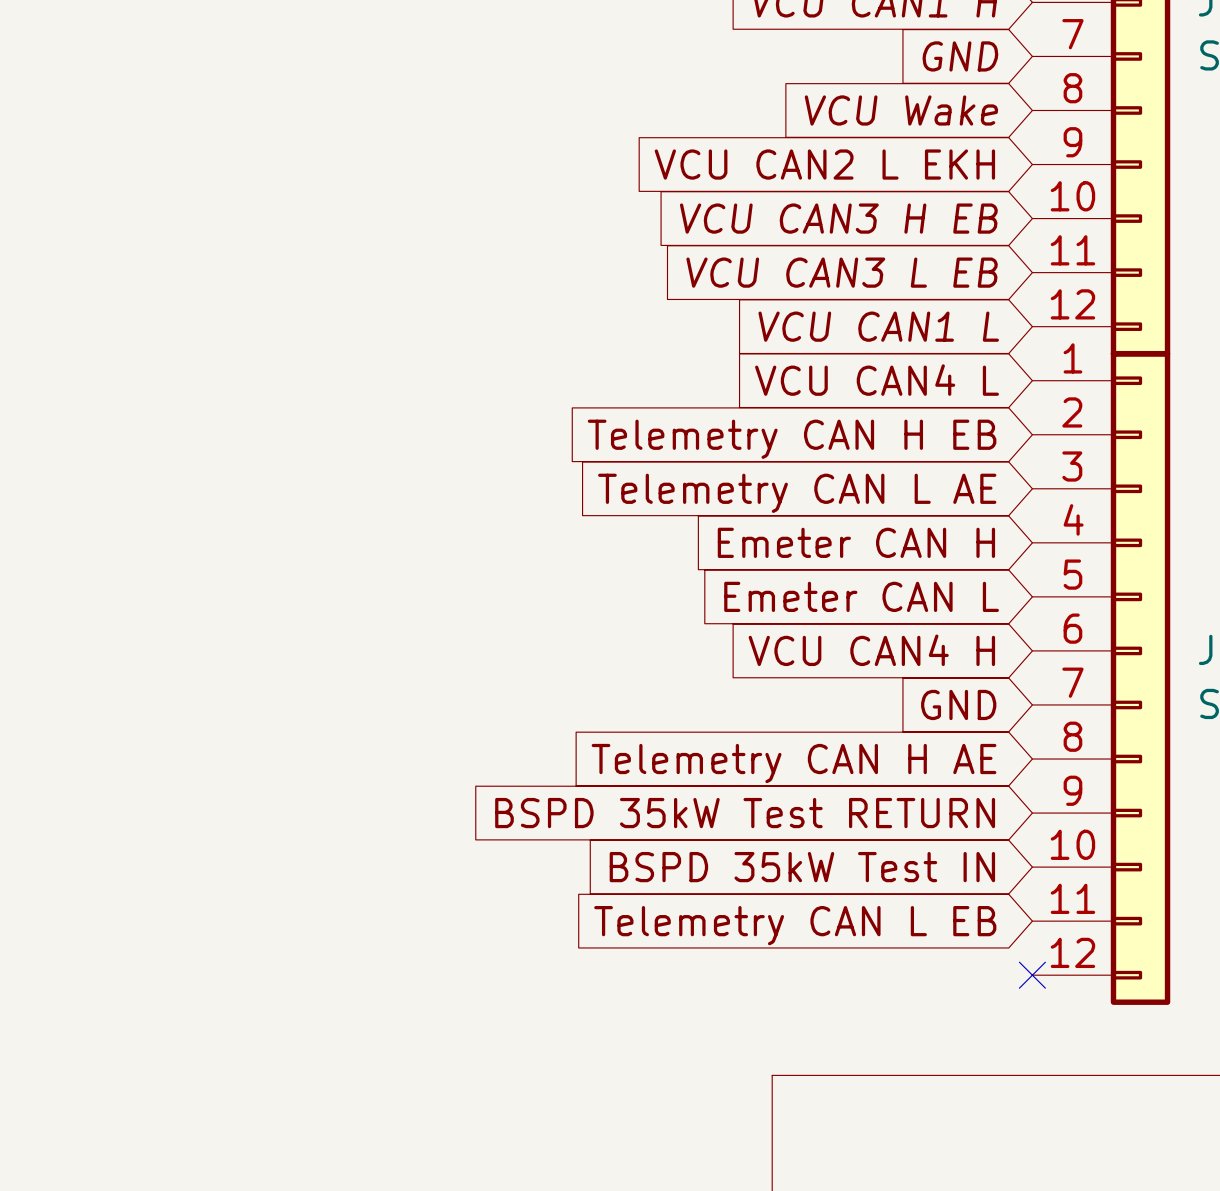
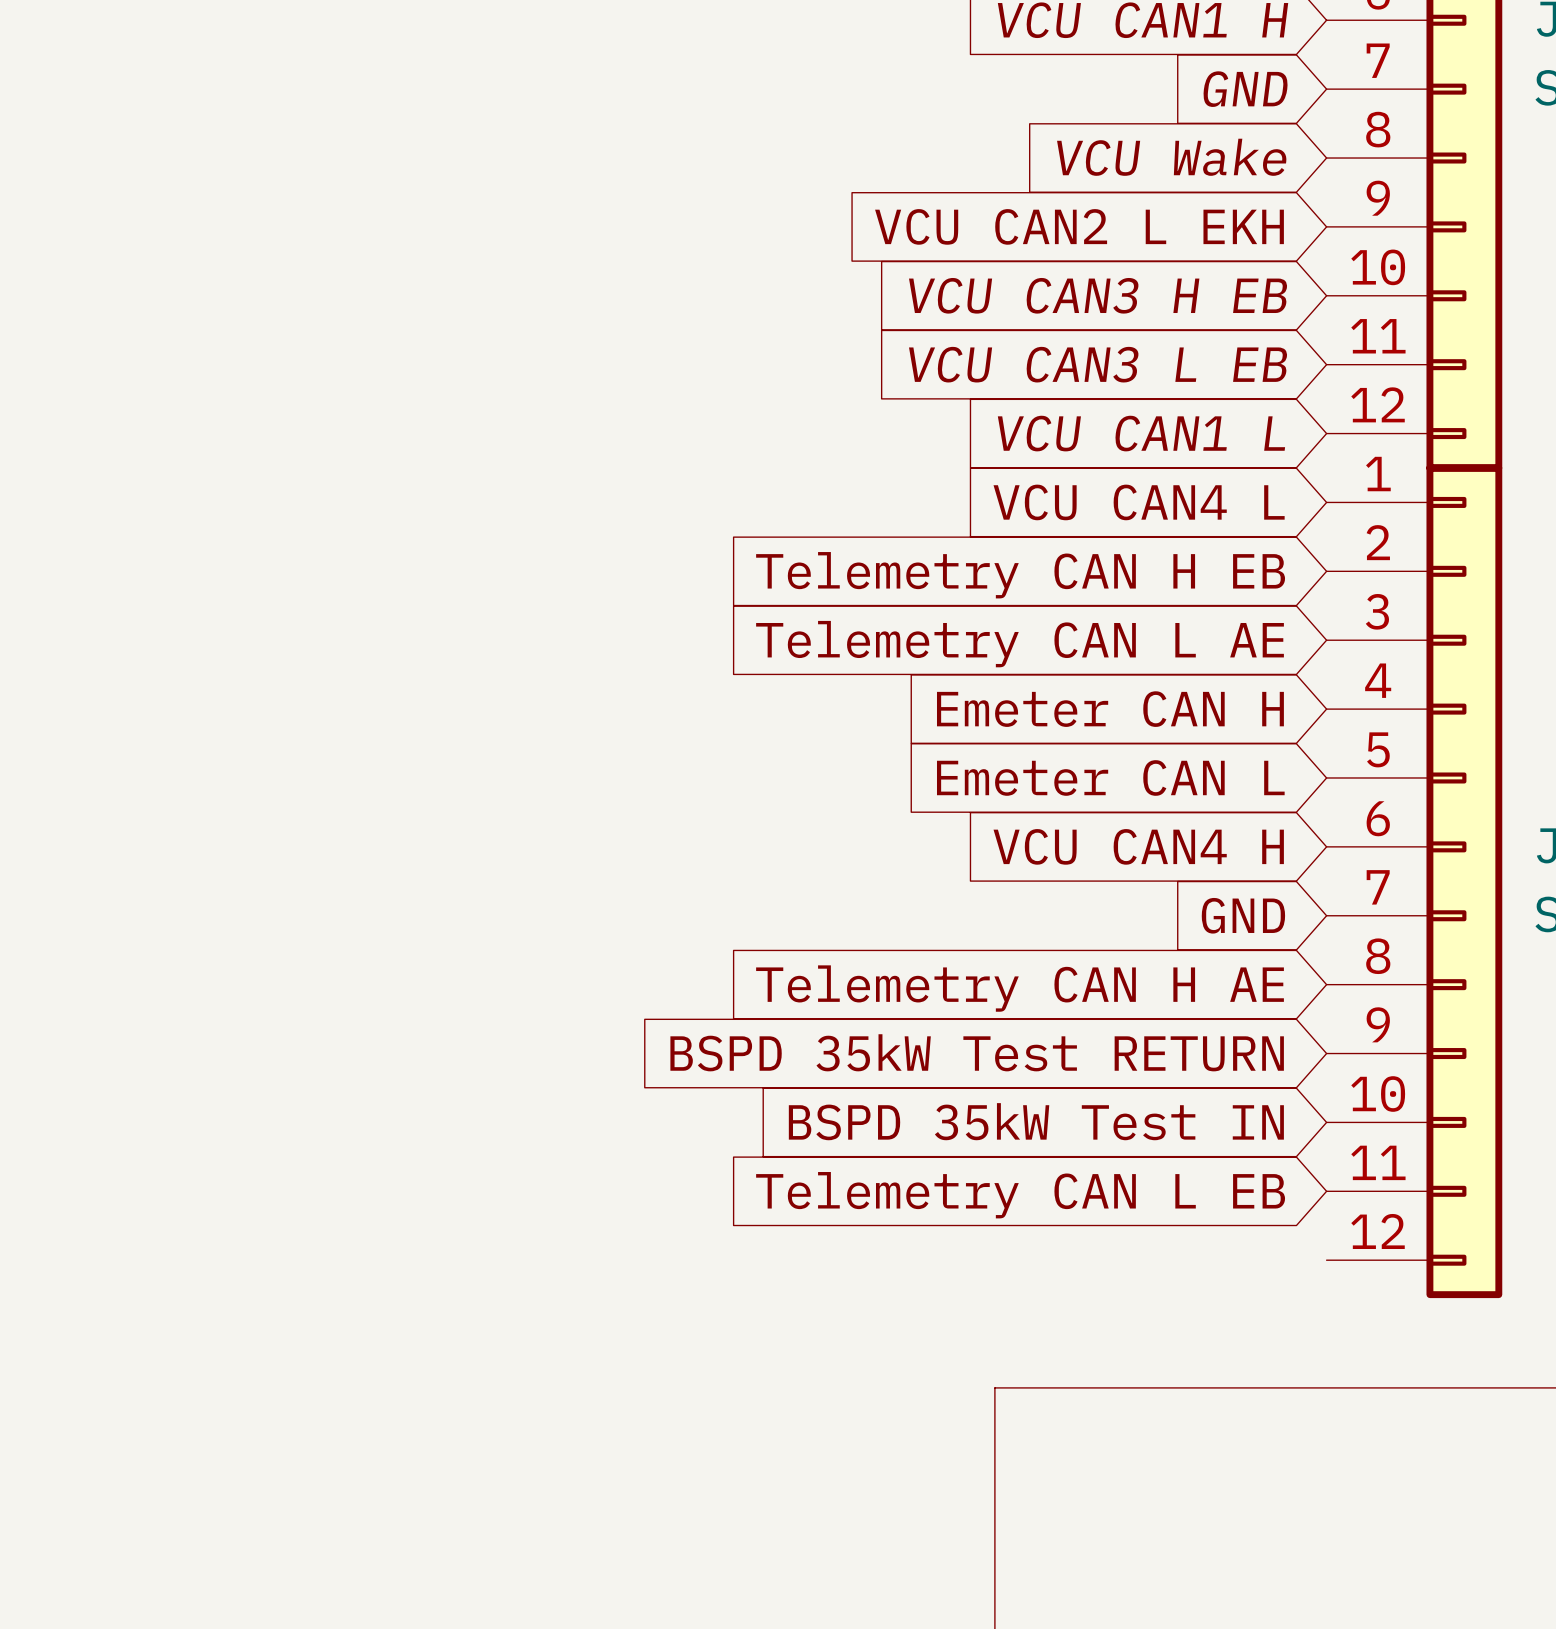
no-connect mark: (1032, 975) -> none

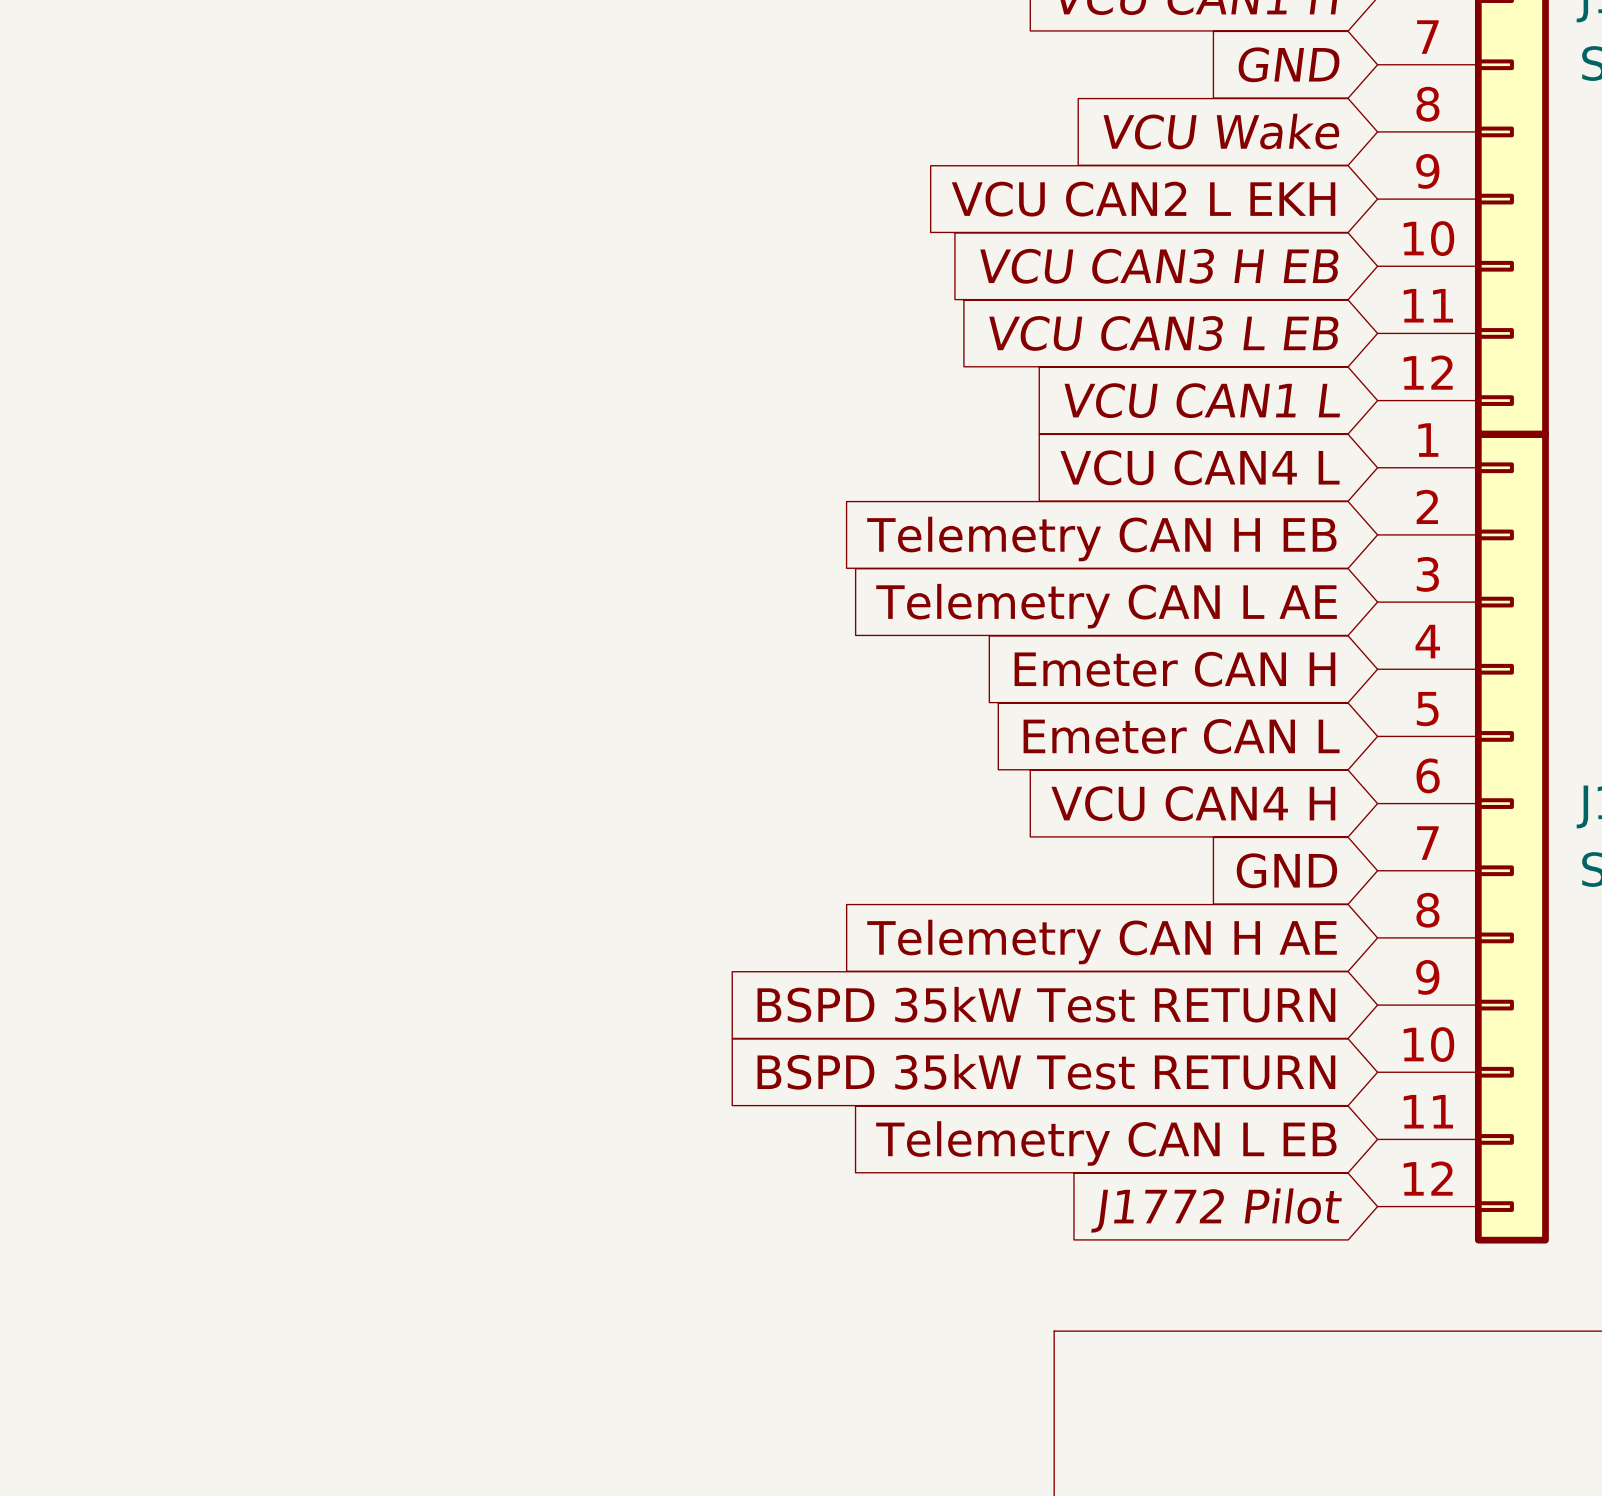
global label: BSPD 35kW Test IN (1036, 1121) -> BSPD 35kW Test RETURN (1046, 1071)
global label: none -> J1772 Pilot (1216, 1210)

